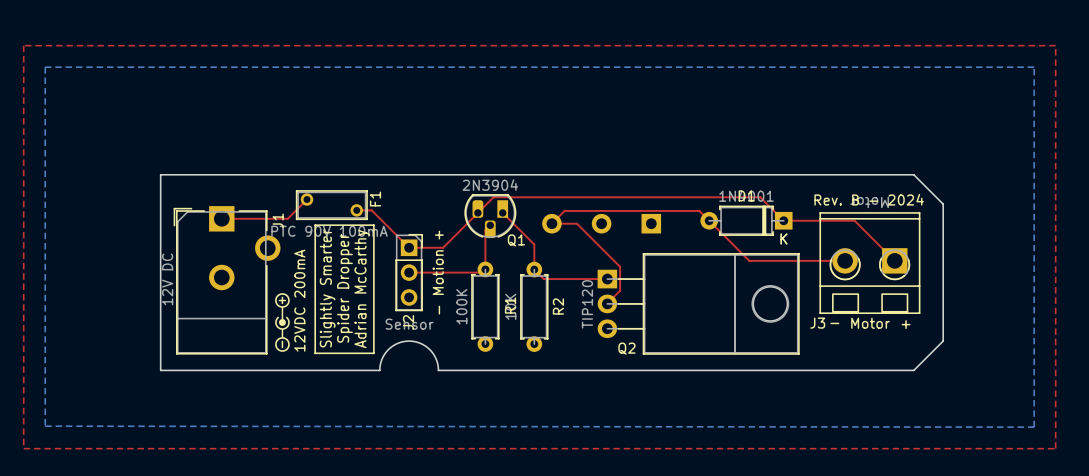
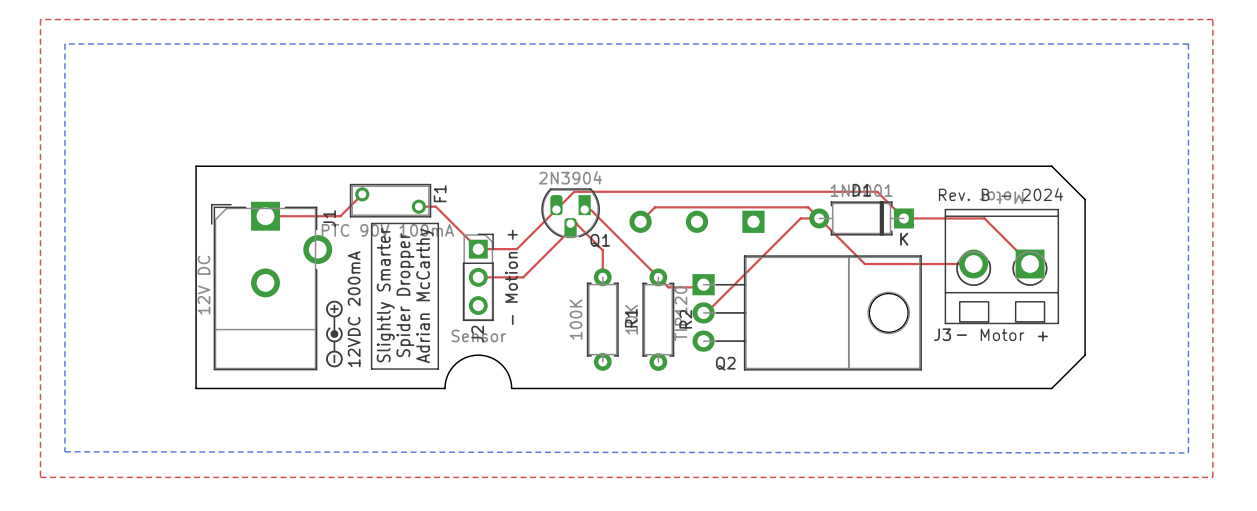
top track: (502, 212) (534, 244) (534, 269) (543, 279) (607, 279) -> none
top track: none -> (591, 210) (668, 287) (703, 287)
top track: none -> (819, 218) (800, 218) (703, 315)
top track: (551, 223) (576, 223) (620, 266) (620, 290) (607, 303) -> none
top track: (490, 225) (485, 230) (485, 269) (482, 272) (448, 272) -> (576, 223) (523, 277)
top track: none -> (576, 223) (602, 250) (602, 277)
R1 position: (485, 306) -> (602, 319)
R2 position: (534, 306) -> (658, 319)

